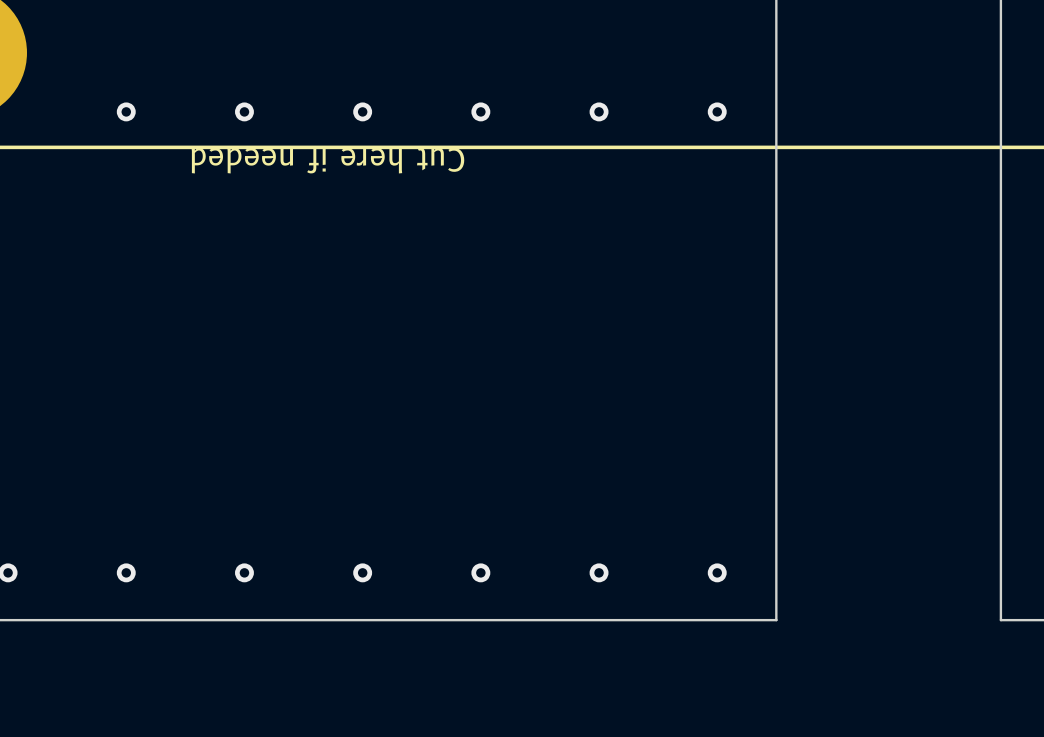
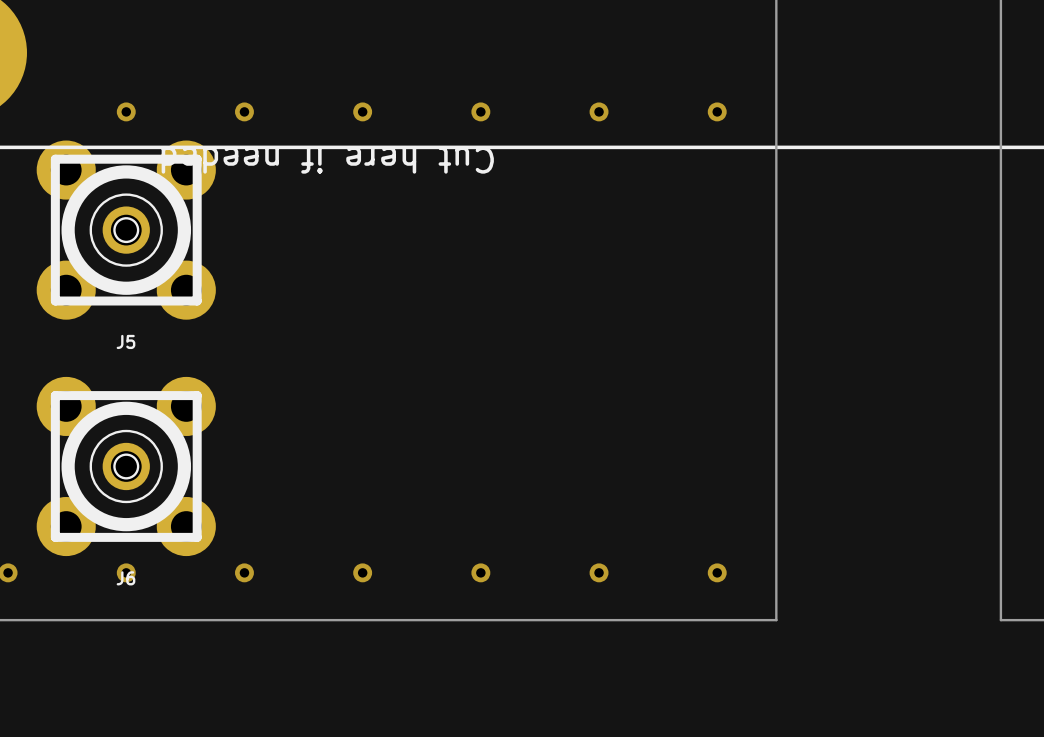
J5: none -> (126, 230)
J6: none -> (126, 466)

